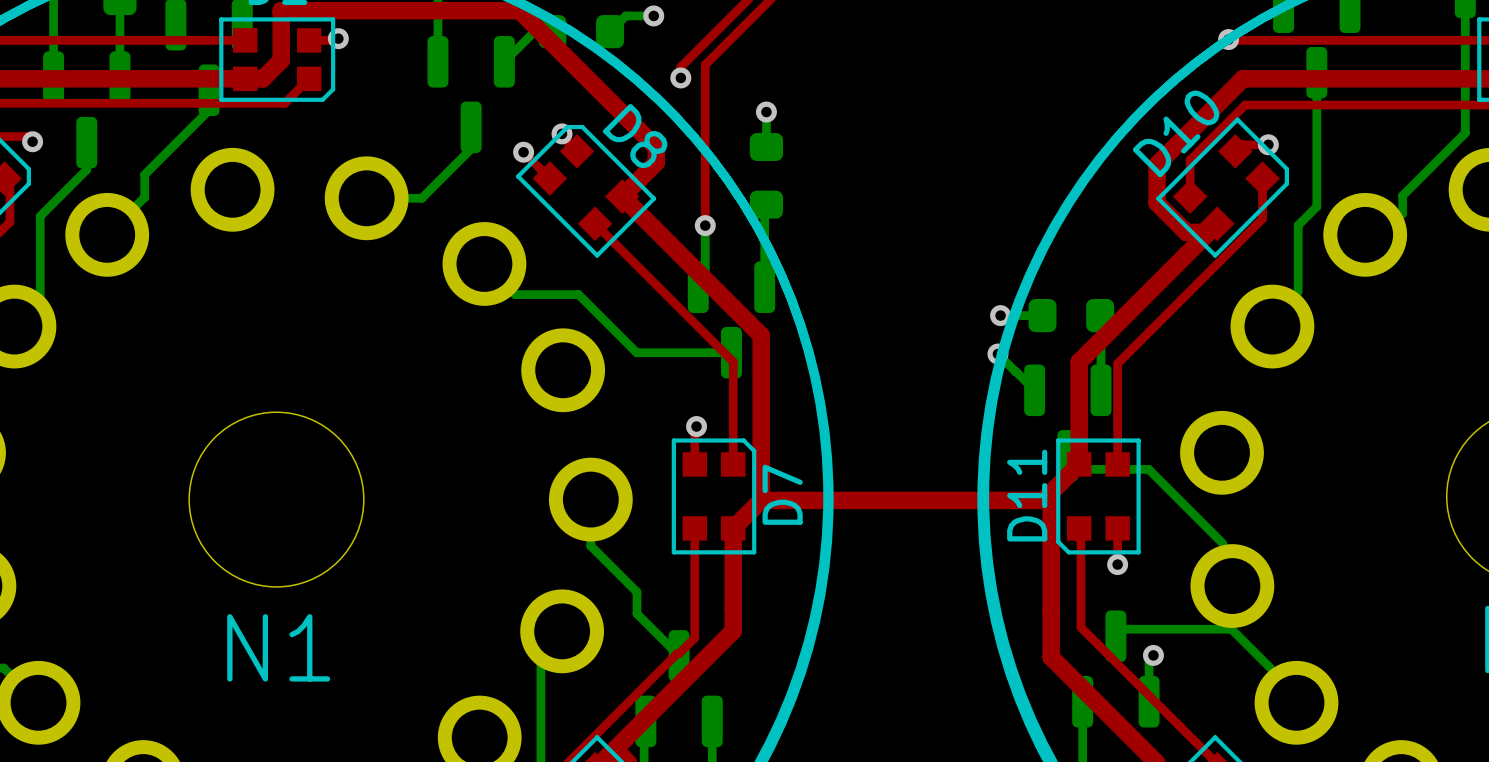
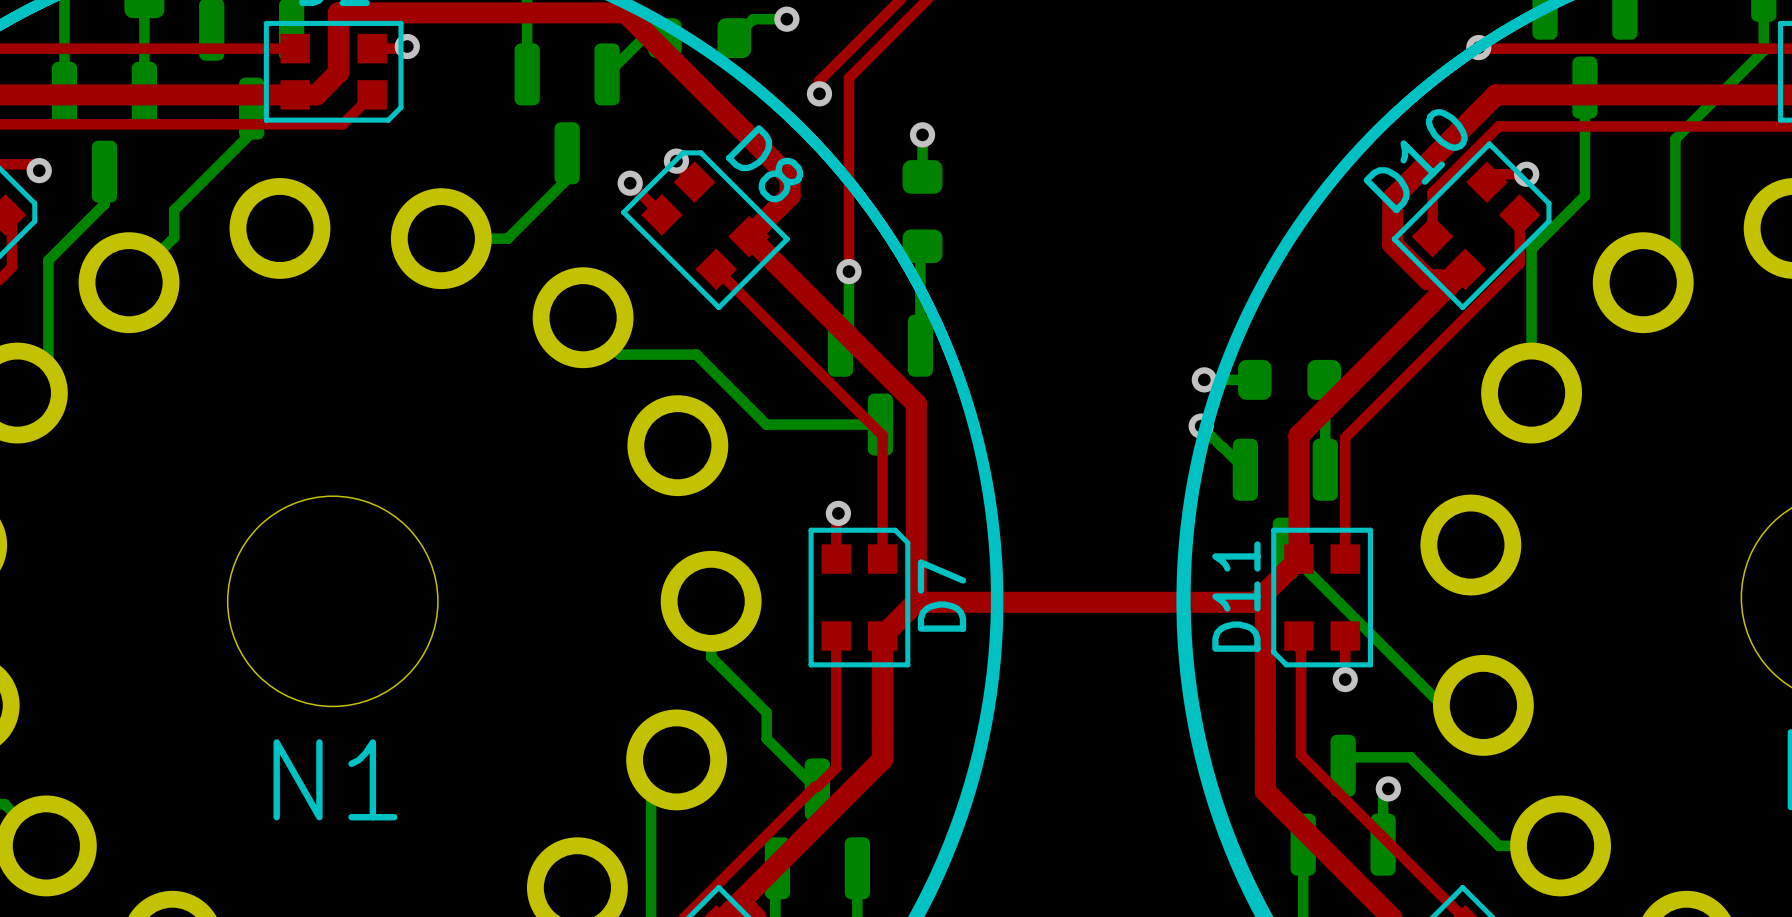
bottom track: (1465, 42) (1465, 133) (1402, 195) (1402, 214) -> (1763, 50) (1675, 139) (1675, 248) (1643, 282)
bottom track: (1316, 162) (1316, 206) (1298, 225) (1298, 292) -> (1584, 195) (1531, 249) (1531, 393)
bottom track: (1081, 469) (1148, 469) (1222, 543) -> (1301, 564) (1442, 705) (1483, 705)
bottom track: (1171, 629) (1231, 629) (1270, 668) -> (1410, 757) (1499, 845) (1550, 845) (1560, 835) (1560, 845)

